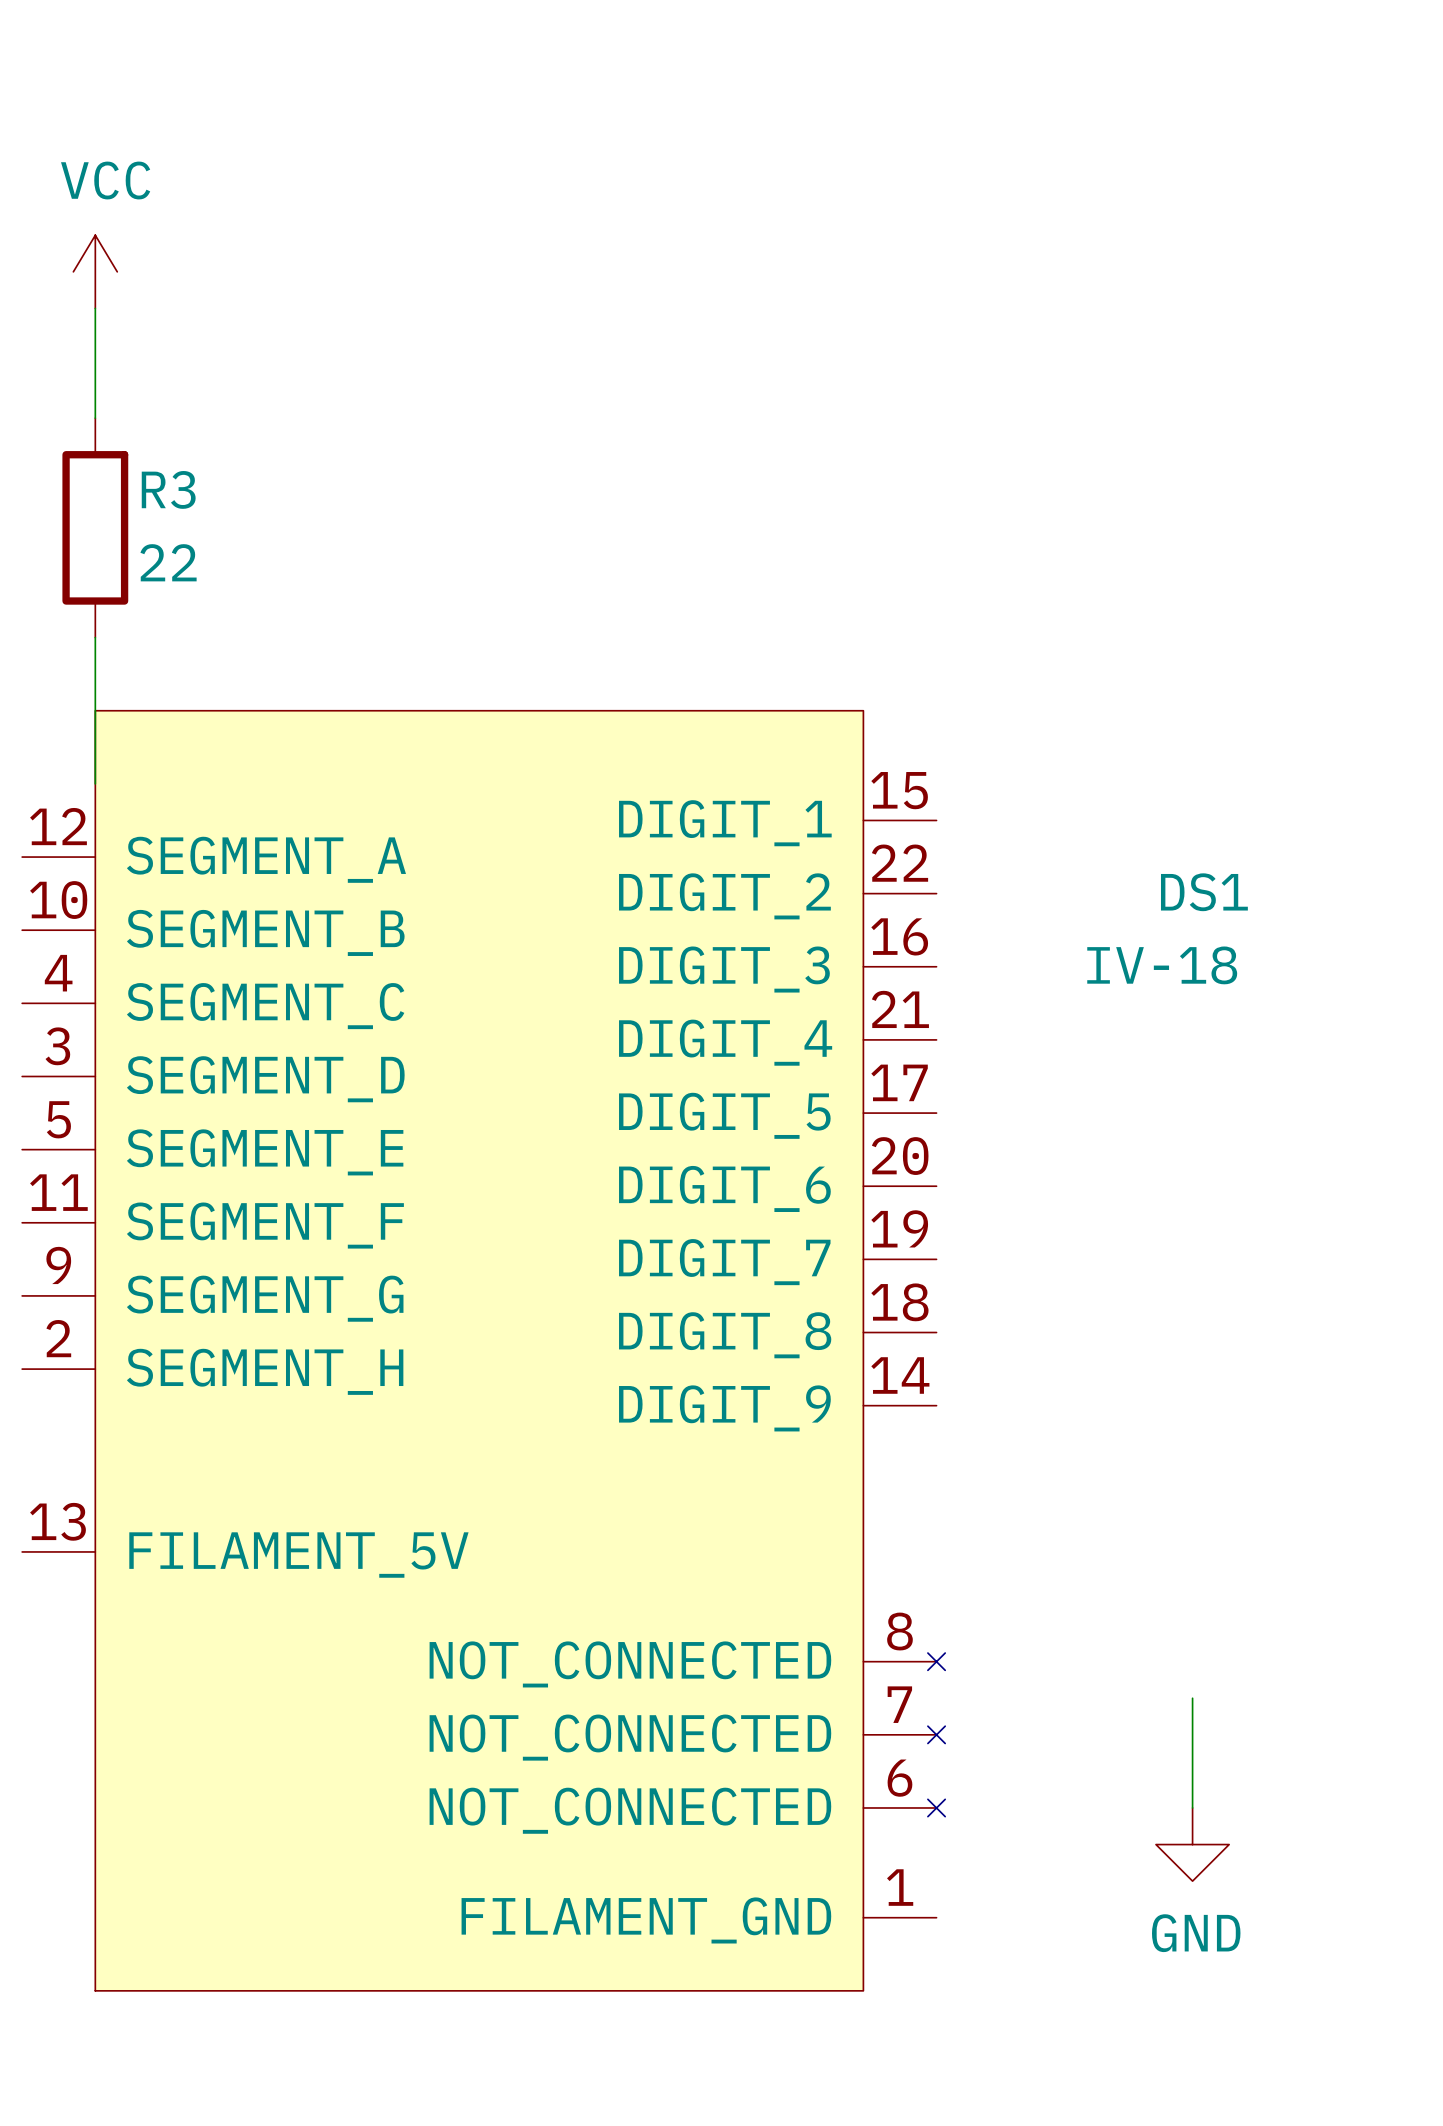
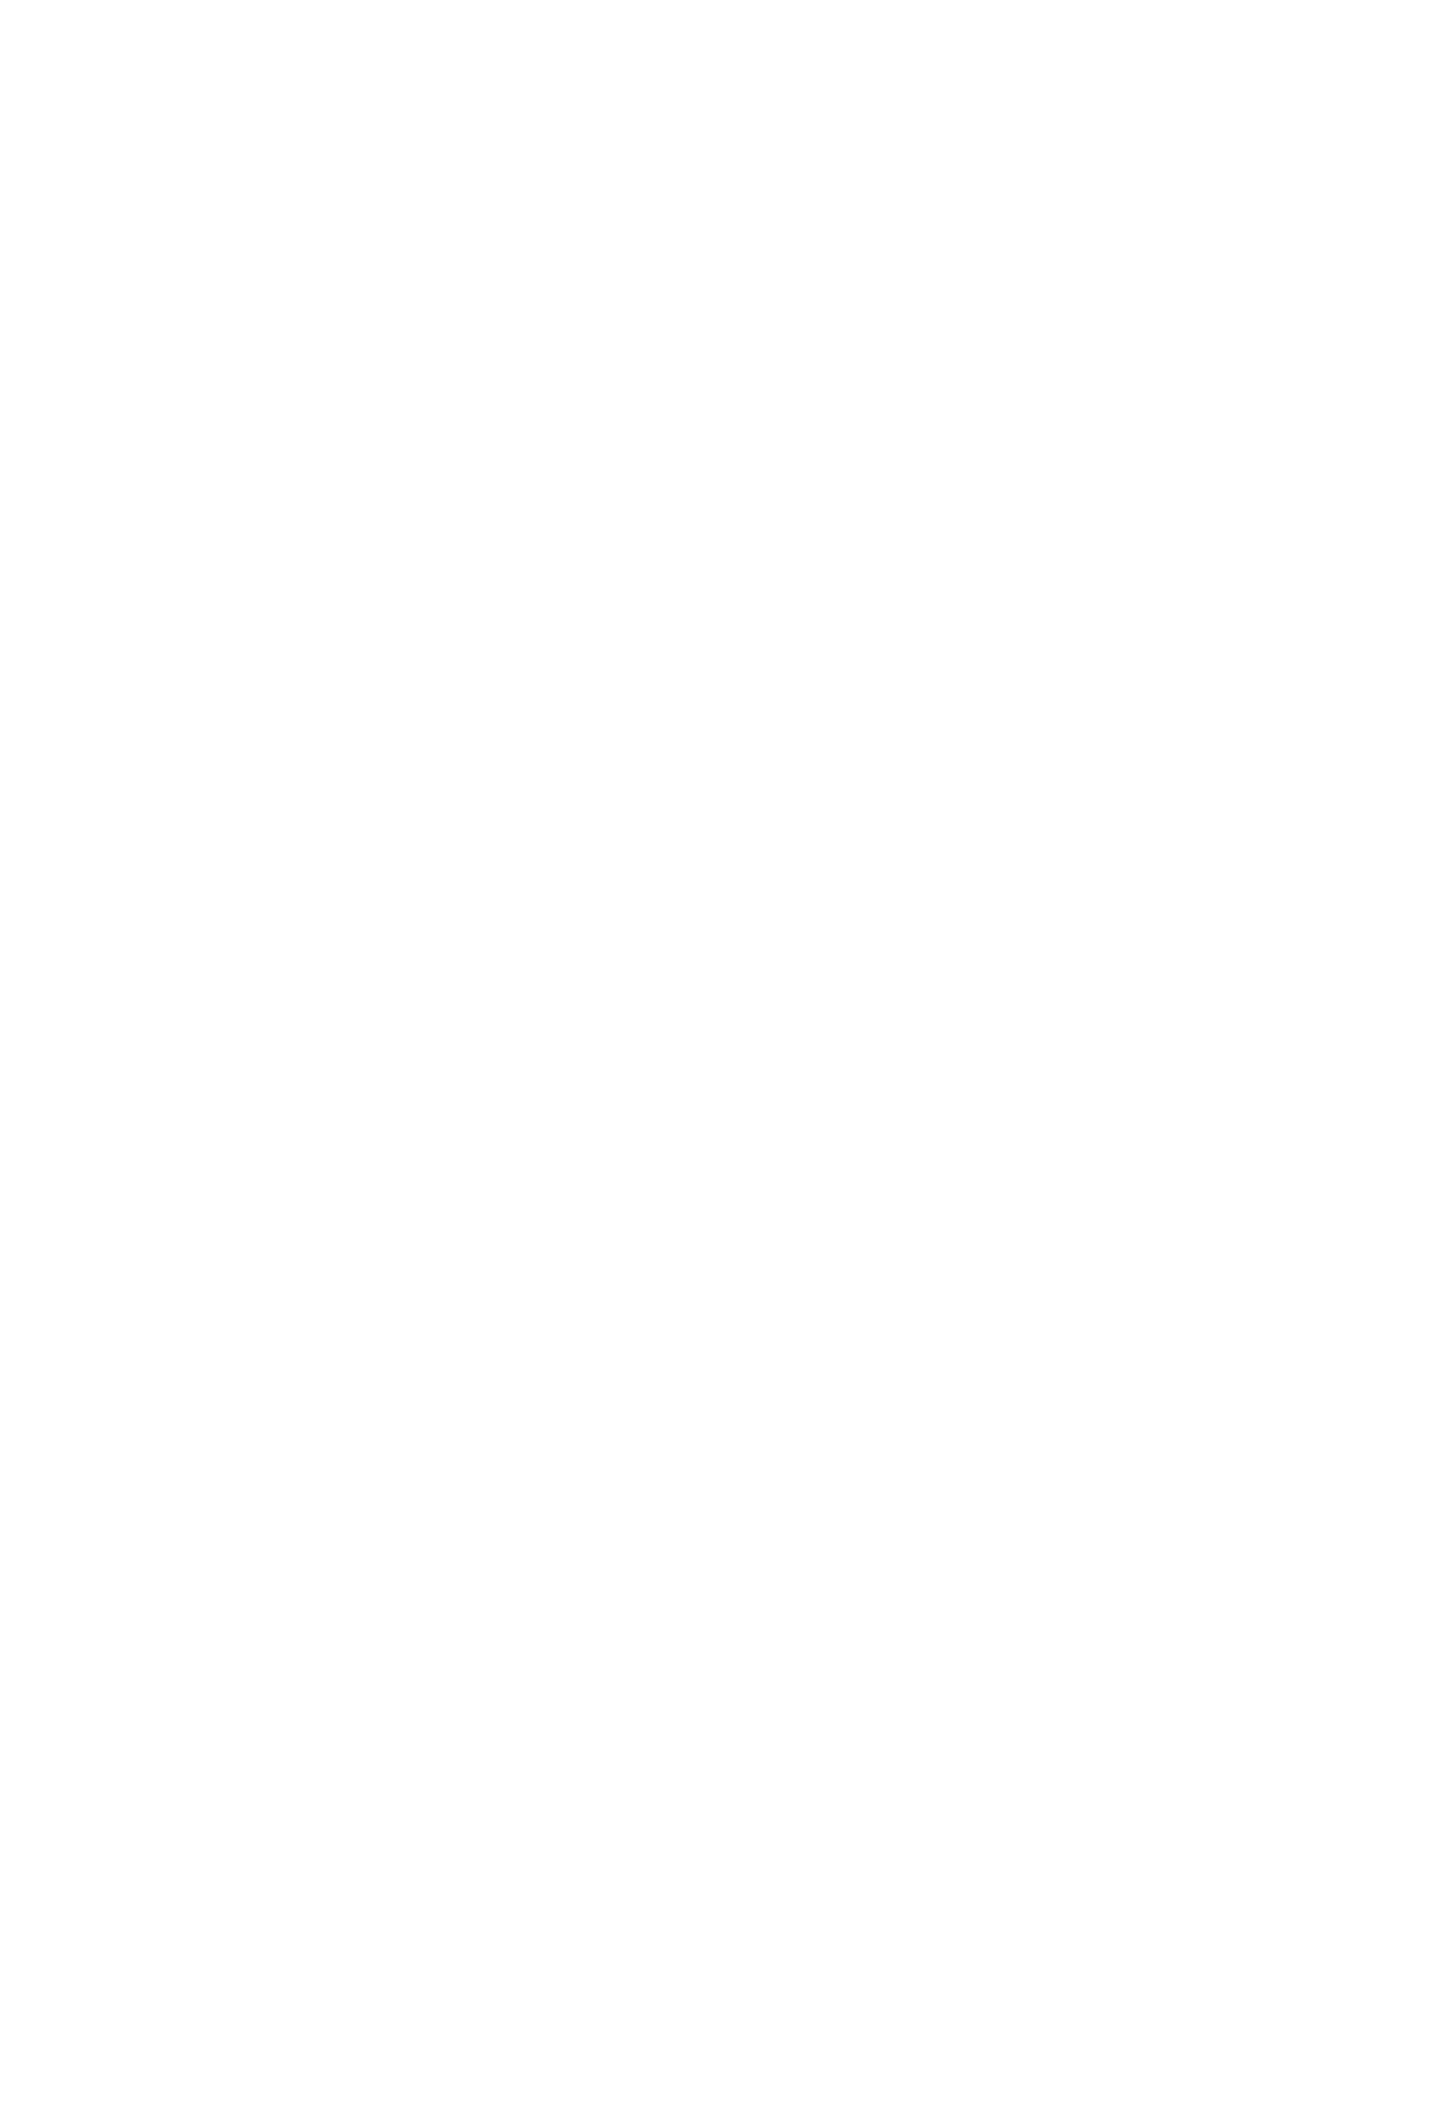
power symbol: VCC (95, 271) -> none
wire: (95, 308) (95, 418) -> none
R3: 22 (95, 527) -> none
wire: (95, 637) (95, 783) -> none
DS1: IV-18 (483, 1350) -> none
wire: (1192, 1698) (1192, 1807) -> none
power symbol: GND (1192, 1844) -> none

